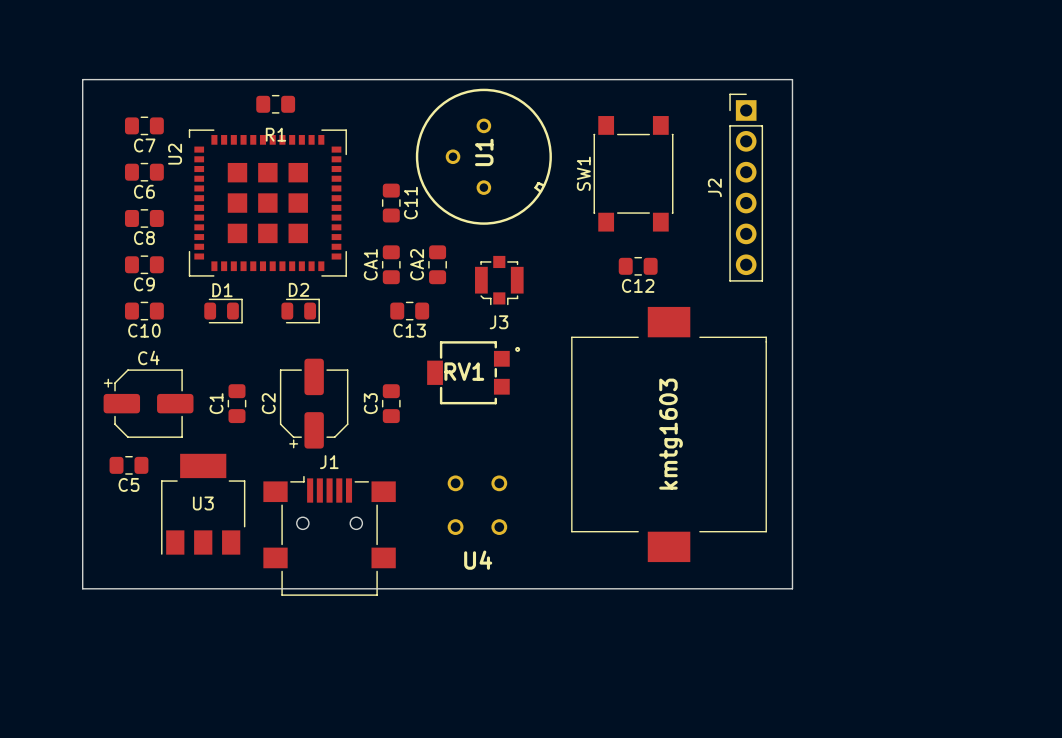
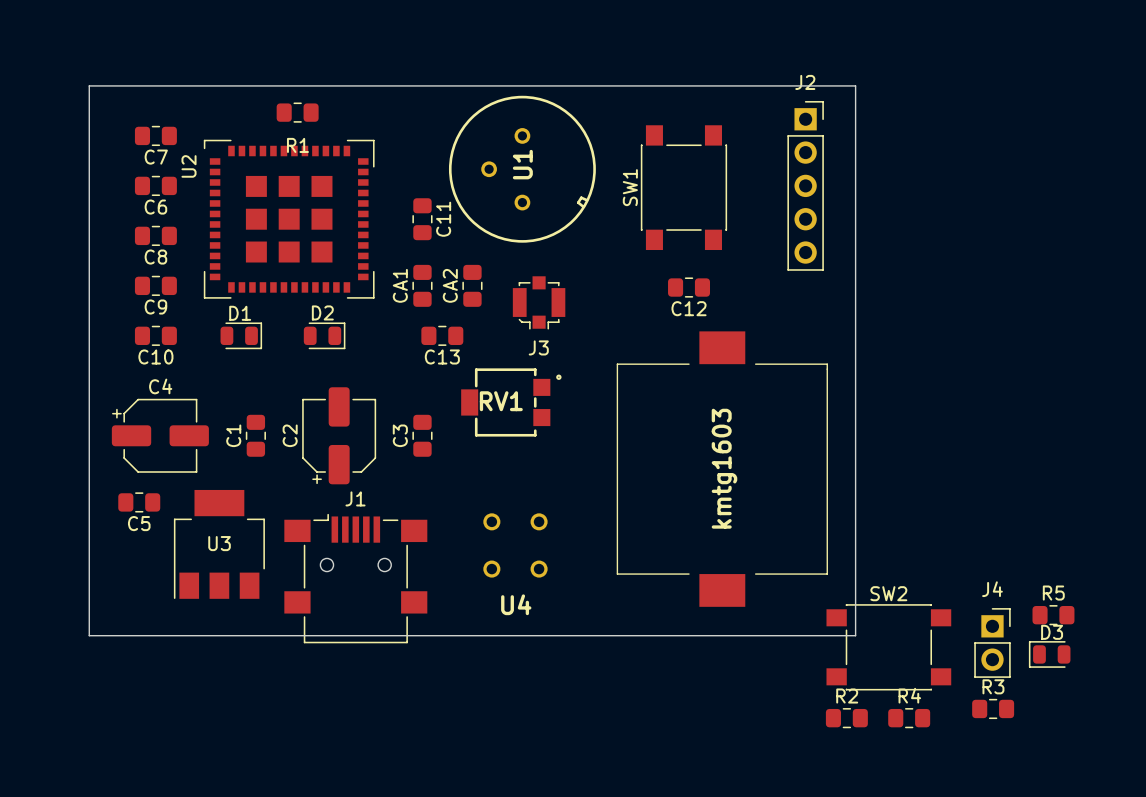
J2 footprint: [729, 93, 764, 282] -> [787, 101, 824, 271]
J2 name position: J2 (714, 187) -> J2 (805, 82)
R5: none -> (1053, 615)
J4: none -> (992, 642)
SW2: none -> (888, 647)
D3: none -> (1049, 654)
R3: none -> (993, 708)
R2: none -> (846, 718)
R4: none -> (909, 718)

